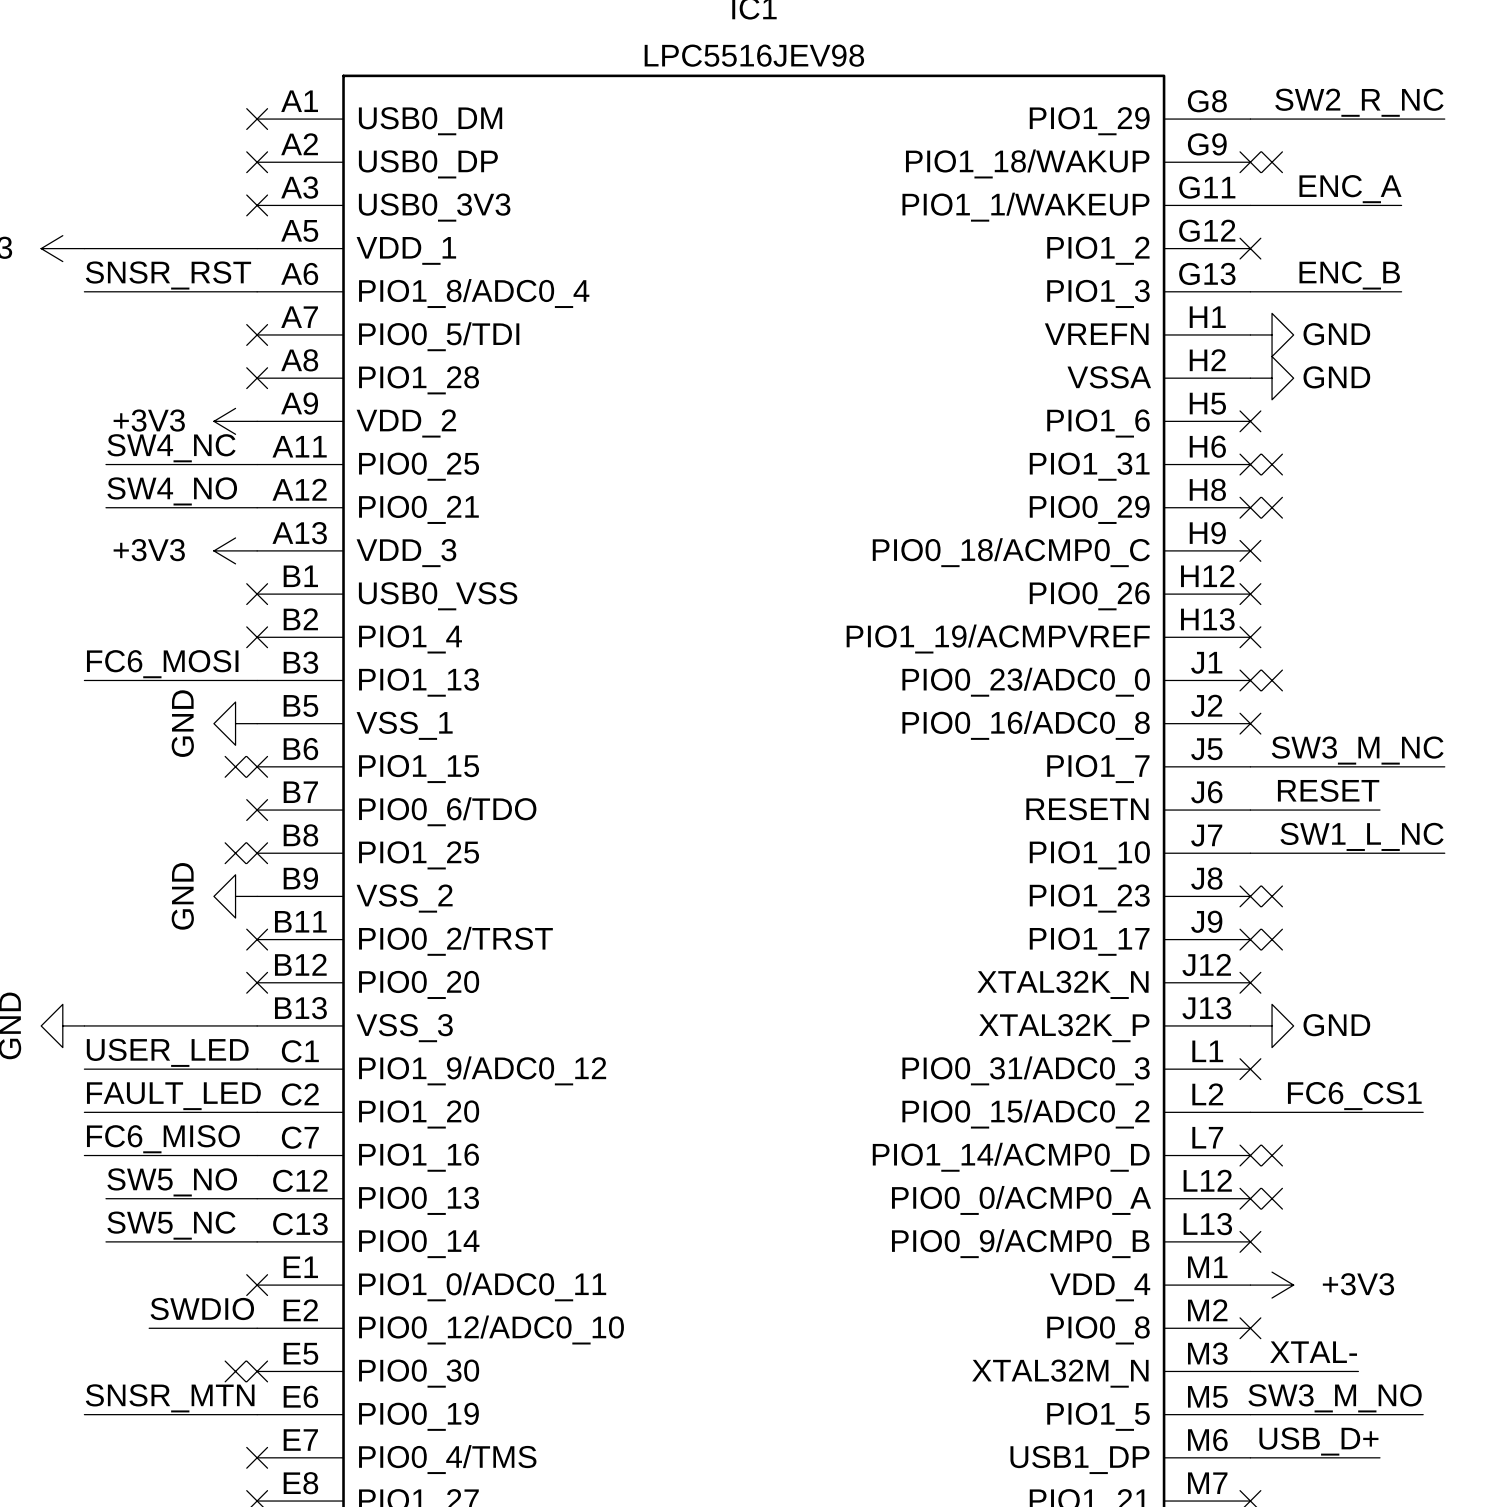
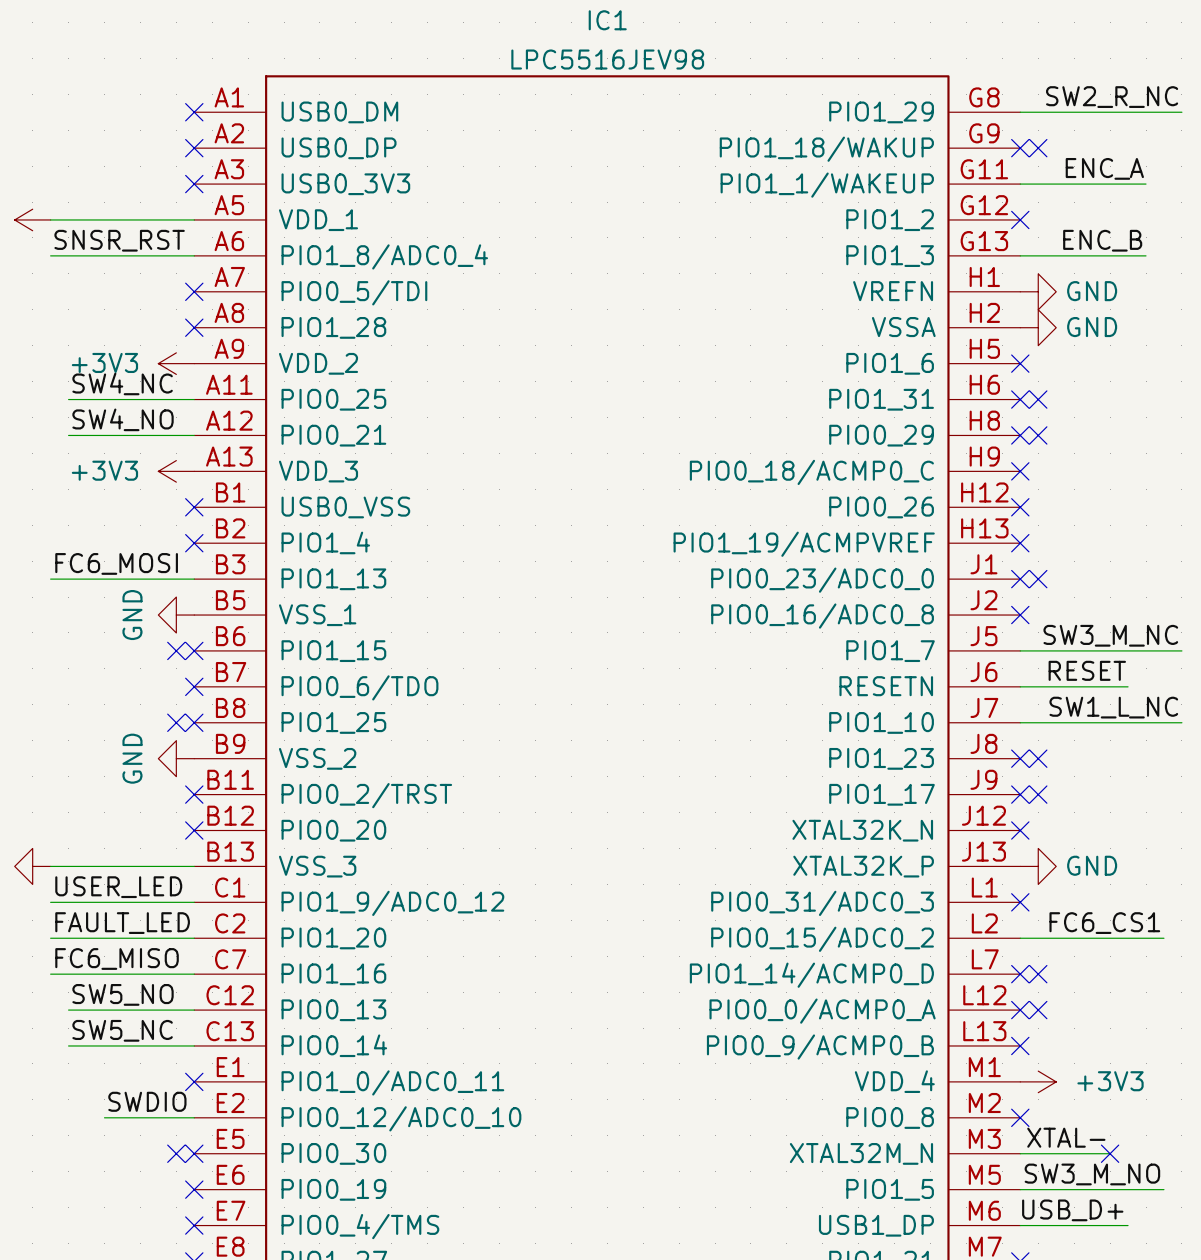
no-connect mark: none -> (1110, 1153)
label: SNSR_MTN (170, 1398) -> none
wire: (84, 1414) (257, 1414) -> none
no-connect mark: none -> (194, 1189)

